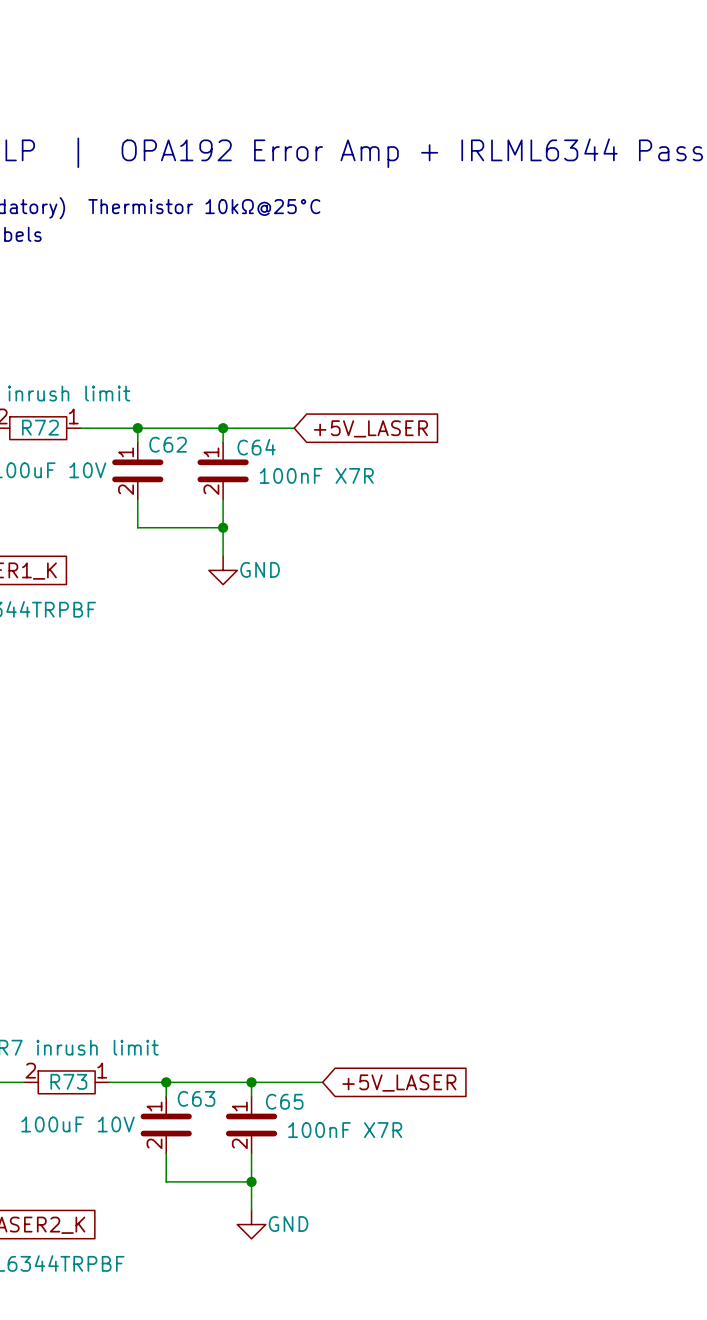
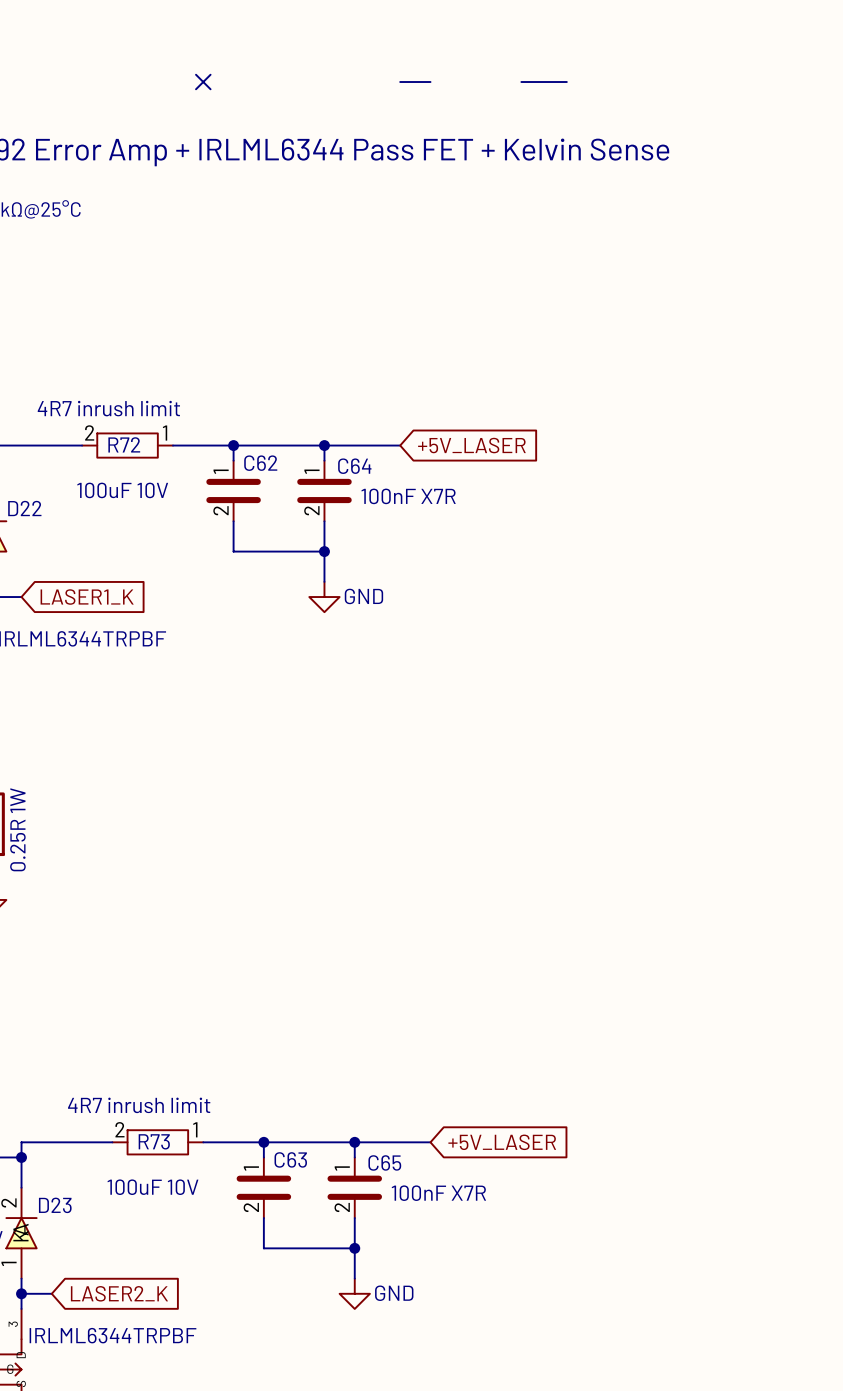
no-connect mark: none -> (203, 82)
wire: none -> (400, 82) (430, 82)
wire: none -> (521, 82) (566, 82)

